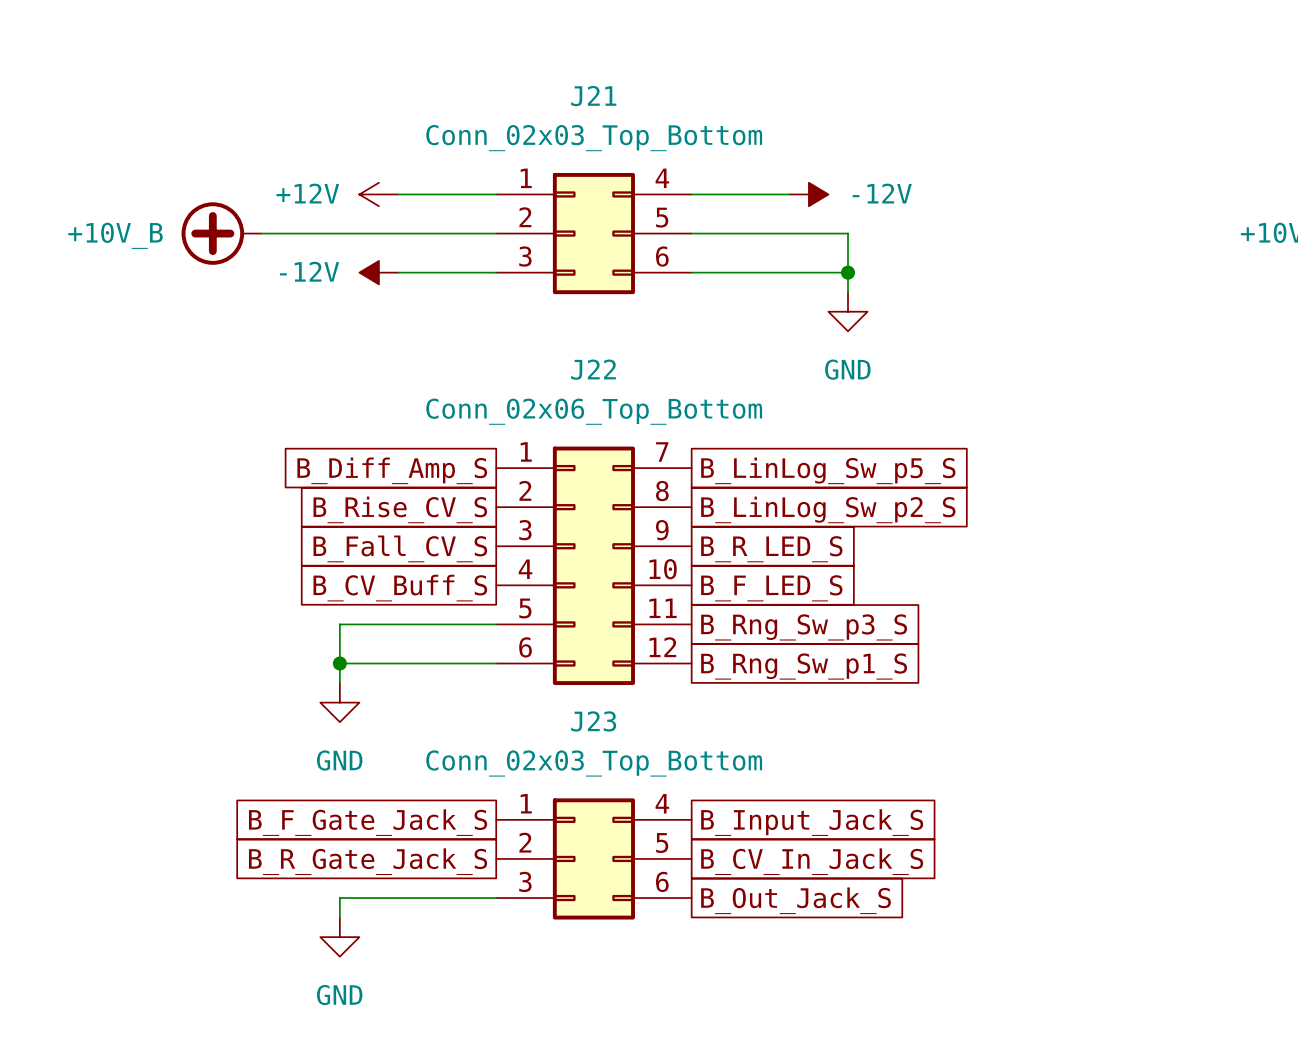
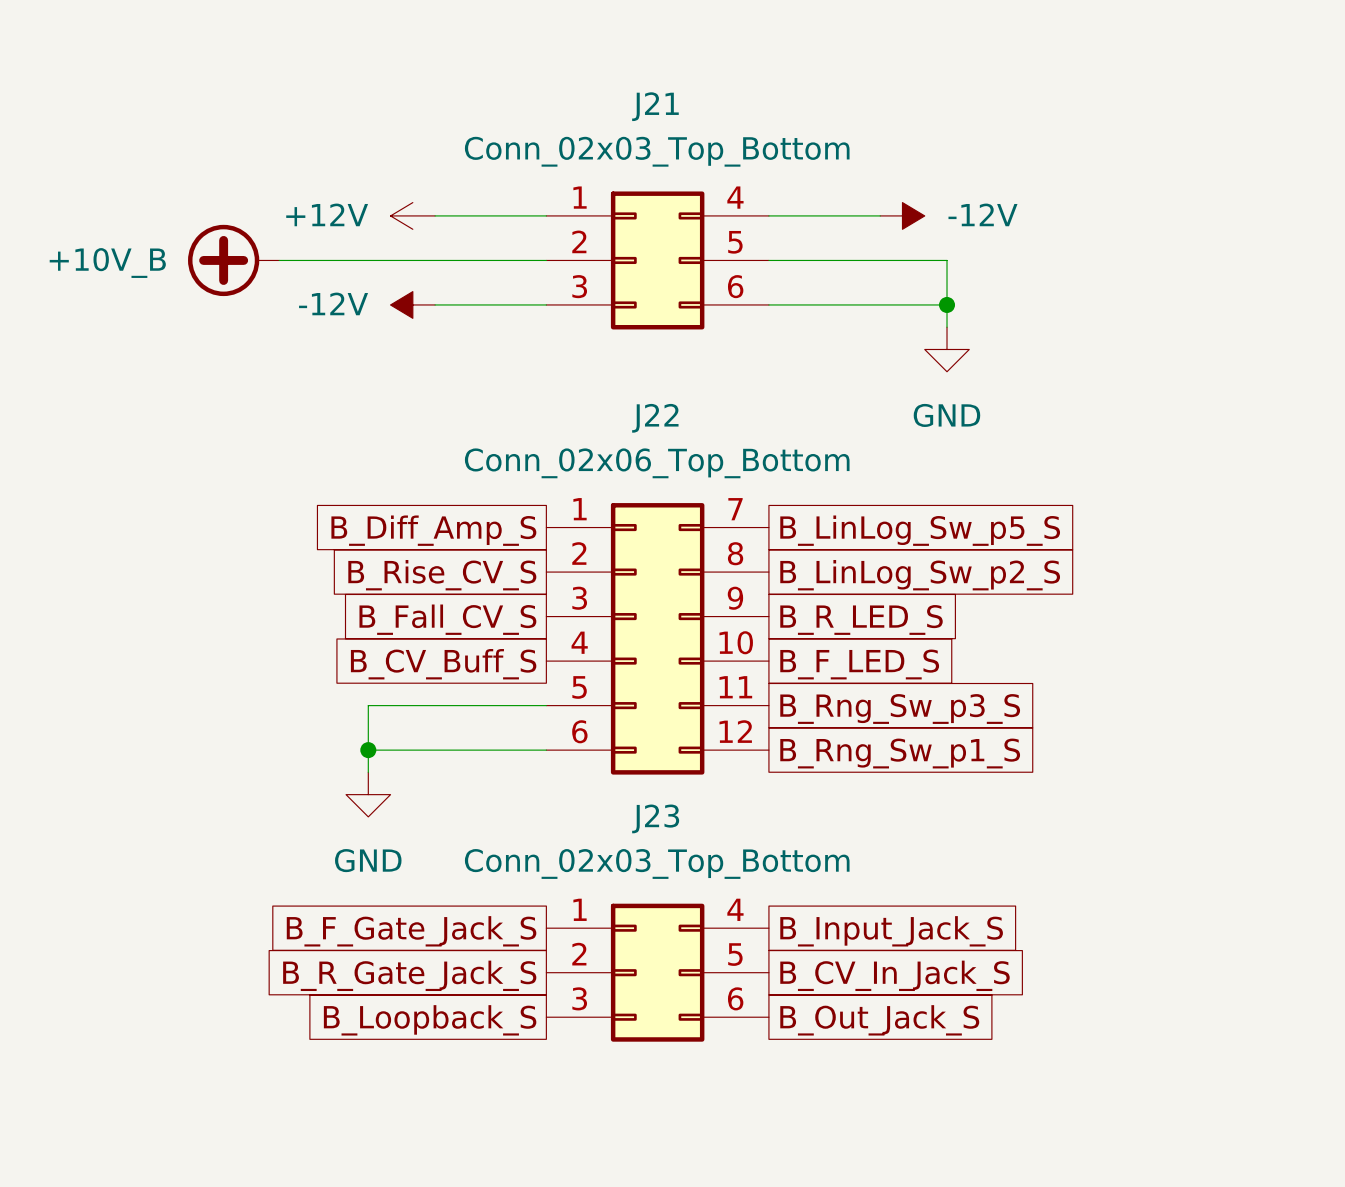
wire: (496, 898) (339, 898) (339, 917) -> none
global label: none -> B_Loopback_S (430, 1020)
power symbol: GND (339, 937) -> none

